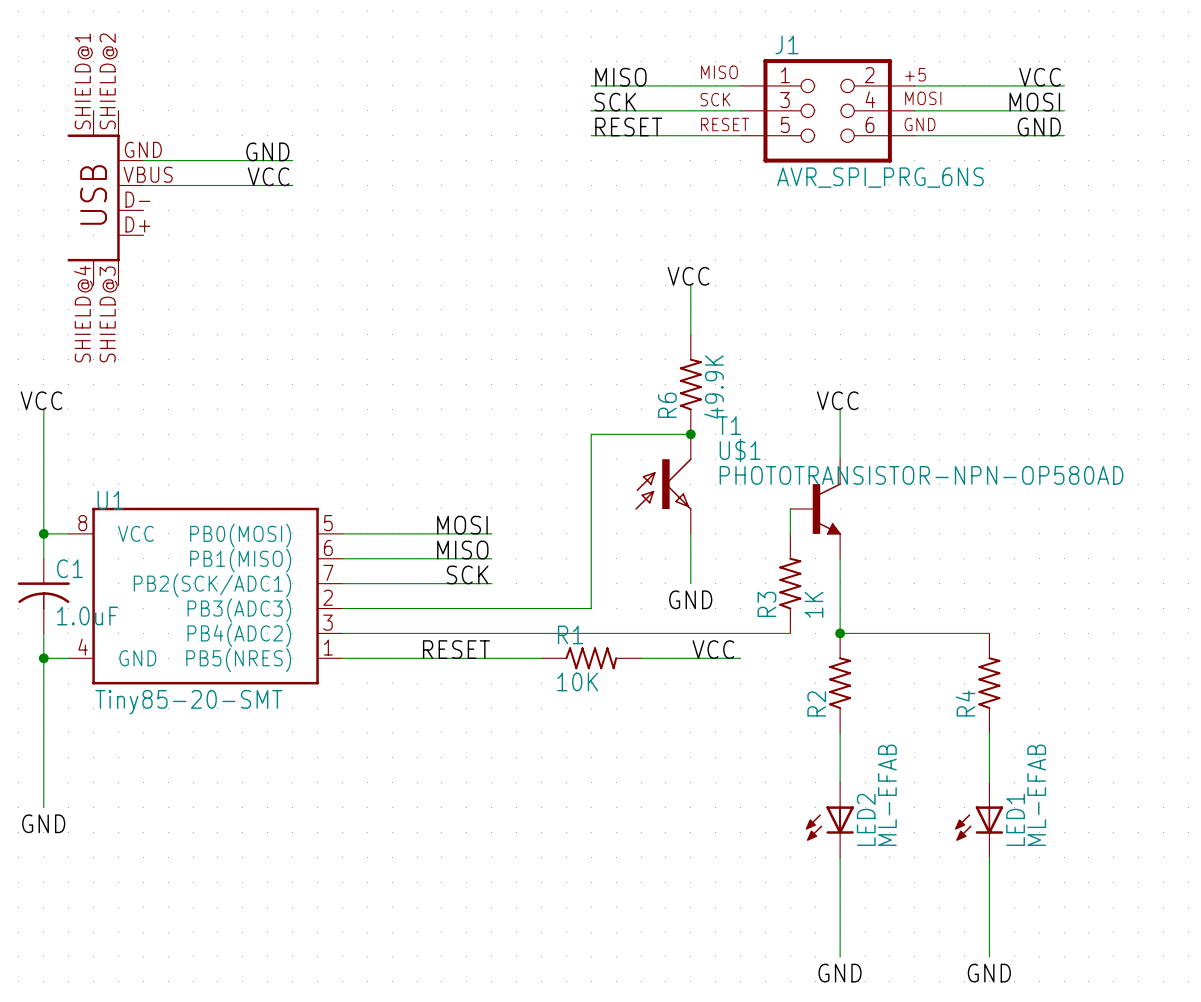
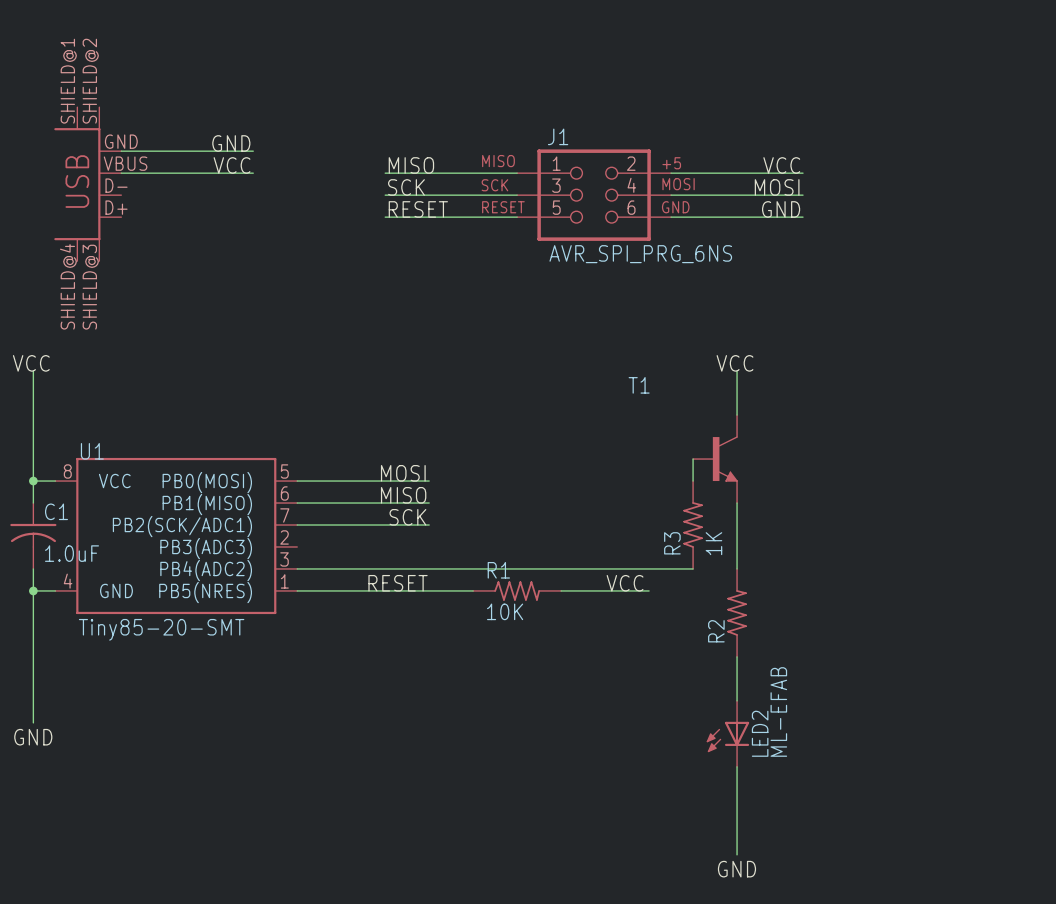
label position: MISO (620, 77) -> MISO (411, 165)
label: VCC (1040, 77) -> none
wire: (591, 85) (740, 85) -> (385, 173) (517, 173)
wire: (914, 85) (1064, 85) -> (671, 173) (803, 173)
label position: SCK (615, 102) -> SCK (406, 187)
label position: MOSI (1034, 102) -> MOSI (777, 187)
wire: (591, 110) (740, 110) -> (385, 195) (517, 195)
J1 position: (827, 110) -> (594, 195)
wire: (914, 110) (1064, 110) -> (671, 195) (803, 195)
label position: RESET (628, 127) -> RESET (418, 209)
label position: GND (1039, 127) -> GND (781, 209)
wire: (591, 135) (740, 135) -> (385, 217) (517, 217)
wire: (914, 135) (1064, 135) -> (671, 217) (803, 217)
label: none -> VCC (781, 165)
label: VCC (688, 276) -> none
wire: (690, 285) (690, 334) -> none
R6: 49.9K (690, 384) -> none
wire: (690, 434) (591, 434) (591, 608) (342, 608) -> none
junction: (690, 434) -> none
U$1: PHOTOTRANSISTOR-NPN-OP580AD (663, 484) -> none
wire: (690, 533) (690, 583) -> none
label: GND (690, 599) -> none
wire: (840, 633) (989, 633) -> none
junction: (840, 633) -> none
R4: (989, 683) -> none
wire: (989, 732) (989, 782) -> none
LED1: ML-EFAB (979, 820) -> none
wire: (989, 857) (989, 956) -> none
label: GND (989, 973) -> none

